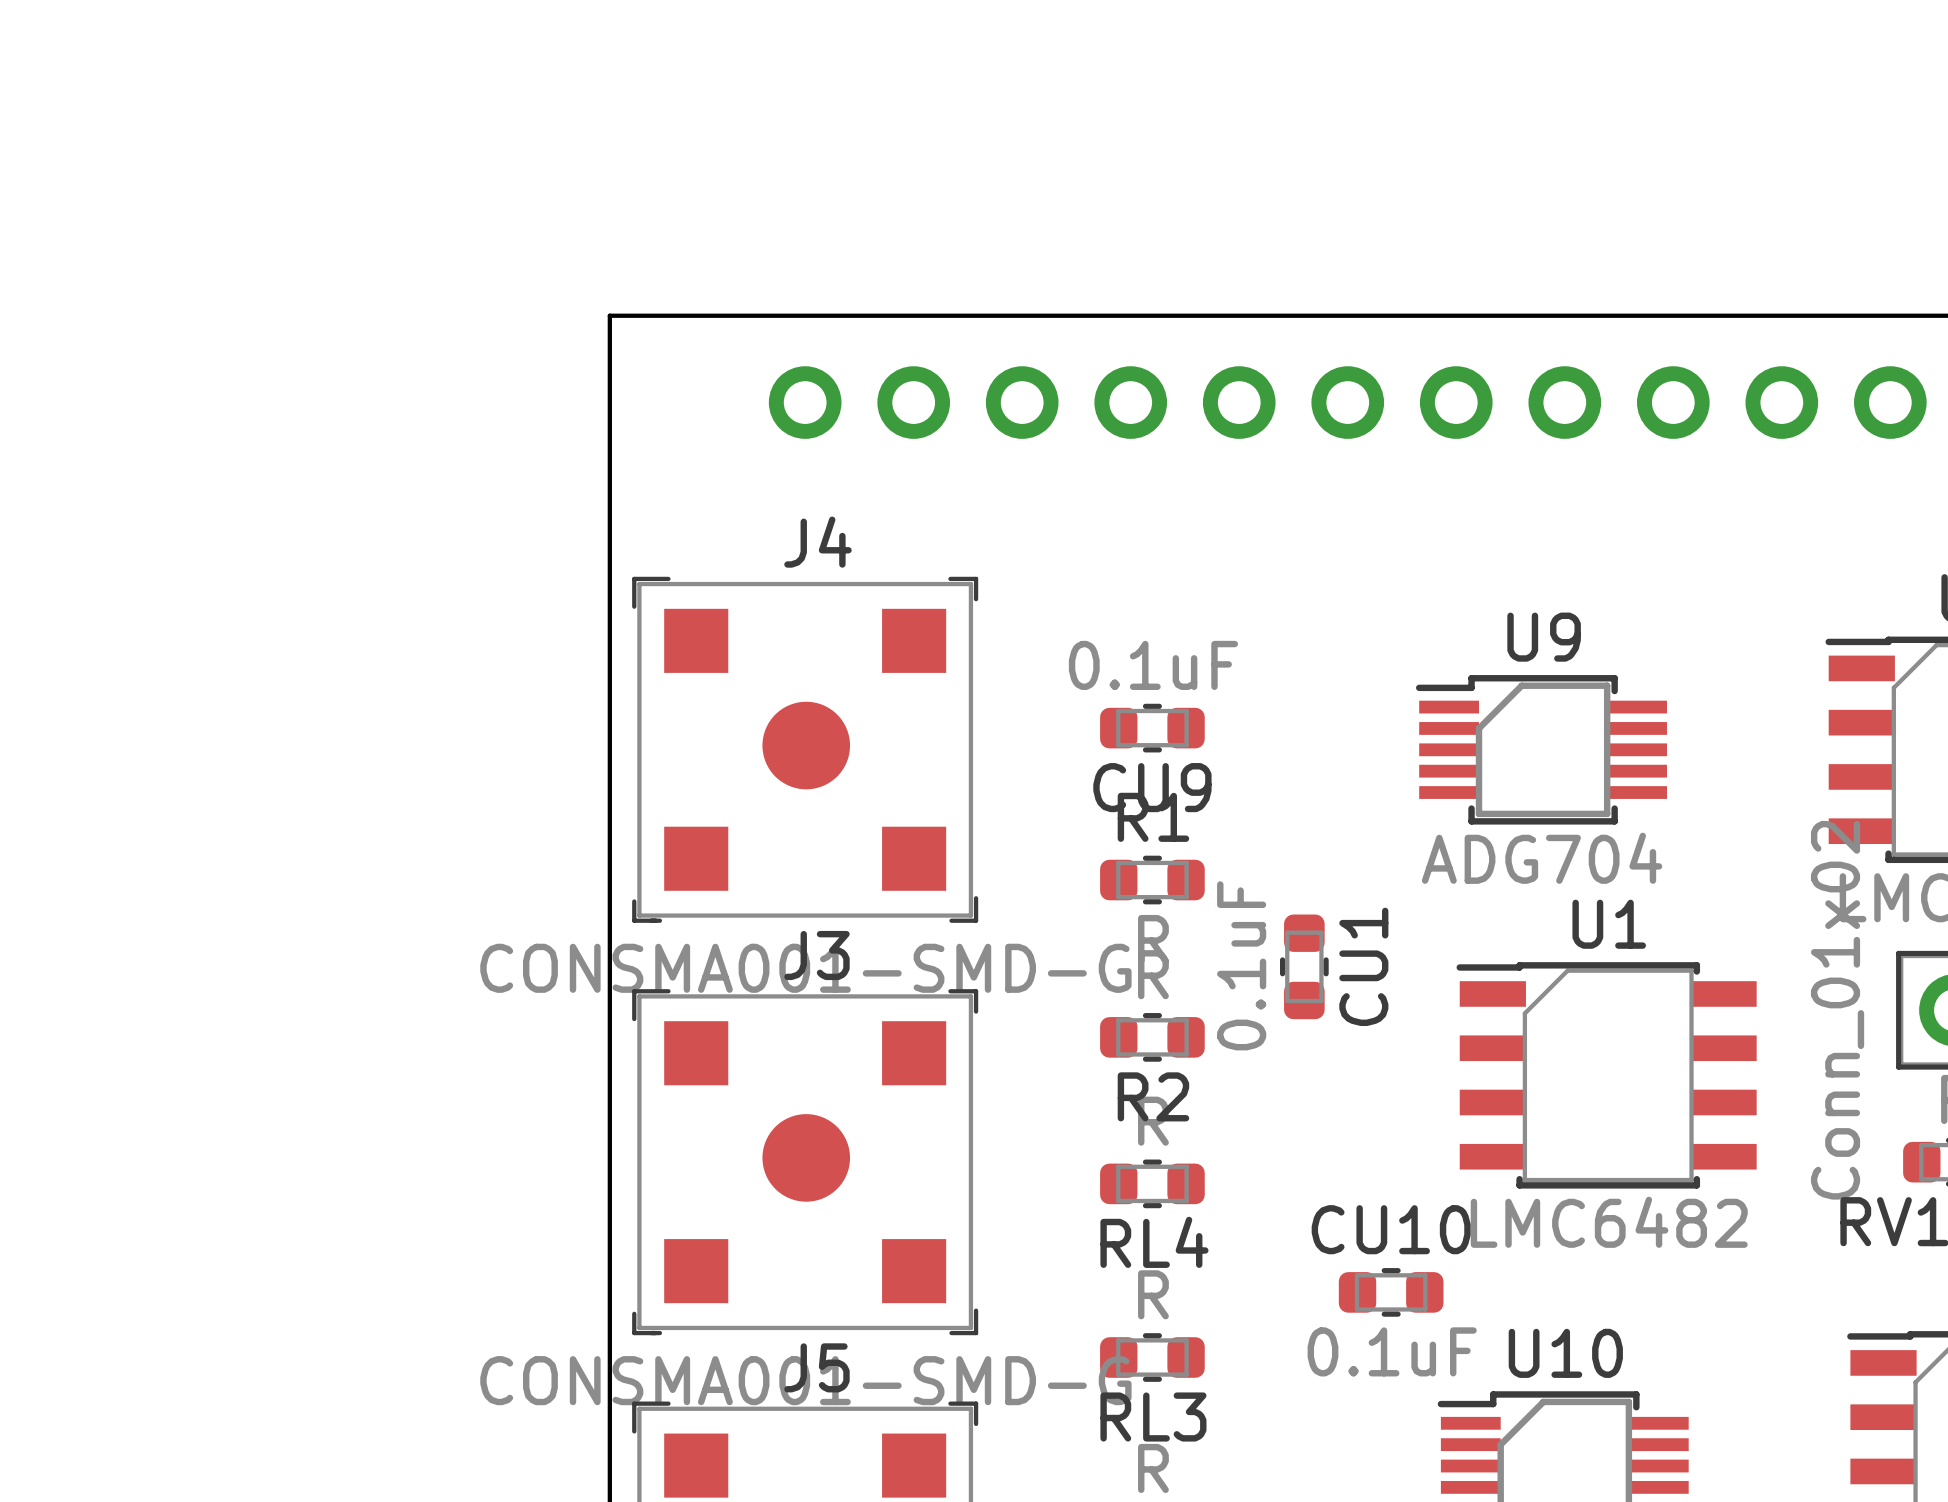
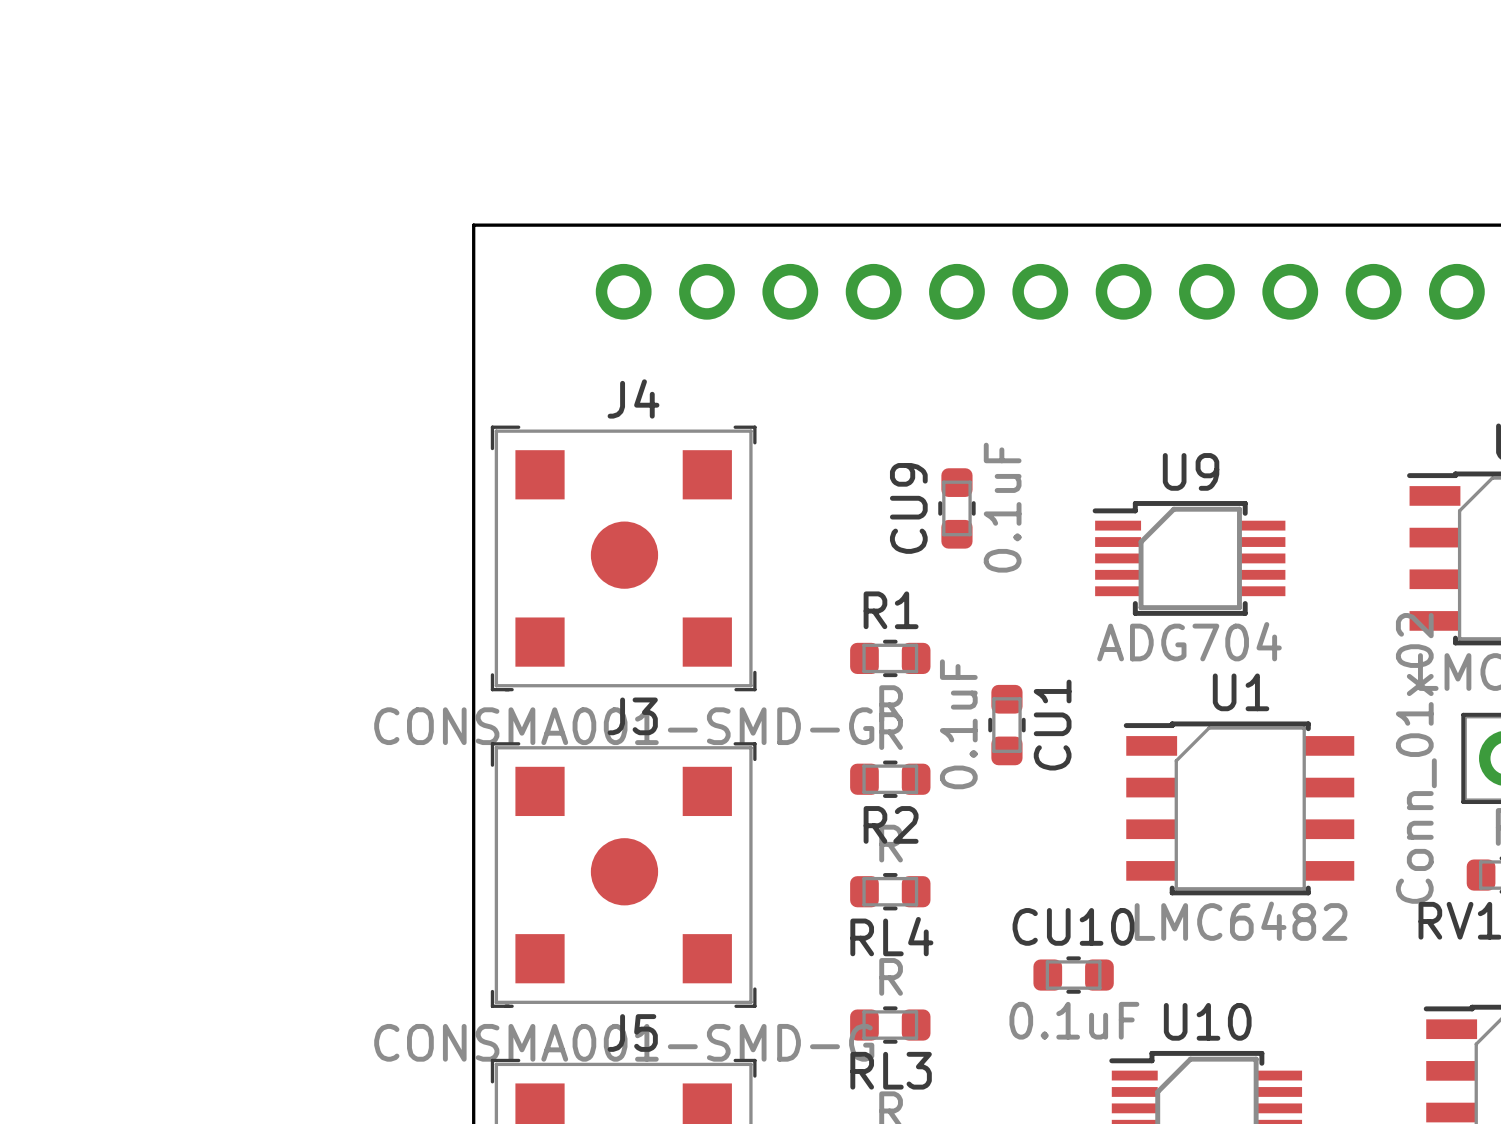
CU9 rotation: 0° (1152, 728) -> 90° clockwise (956, 508)
CU9 position: (1152, 728) -> (956, 508)

